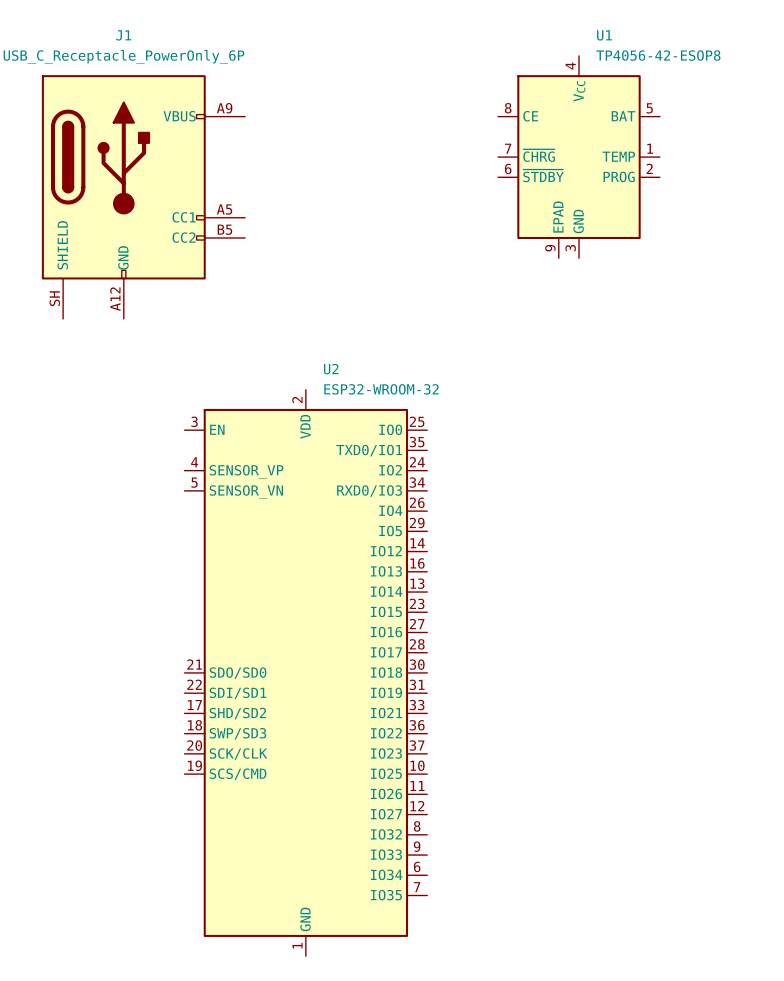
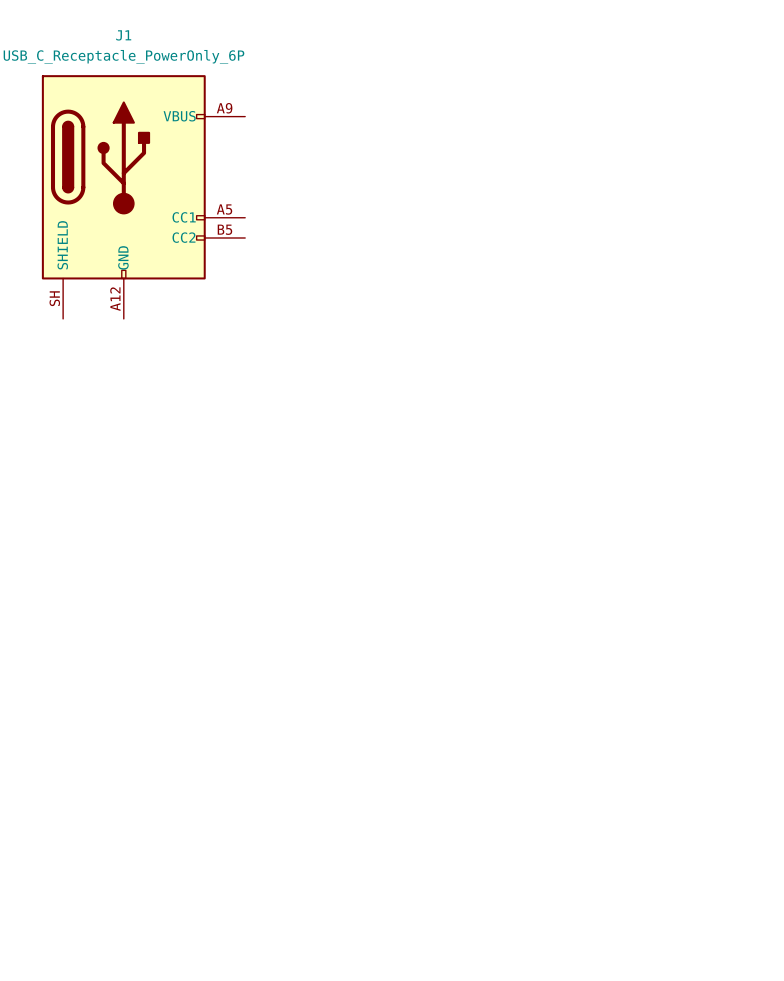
U1: TP4056-42-ESOP8 (578, 157) -> none
U2: ESP32-WROOM-32 (305, 672) -> none

